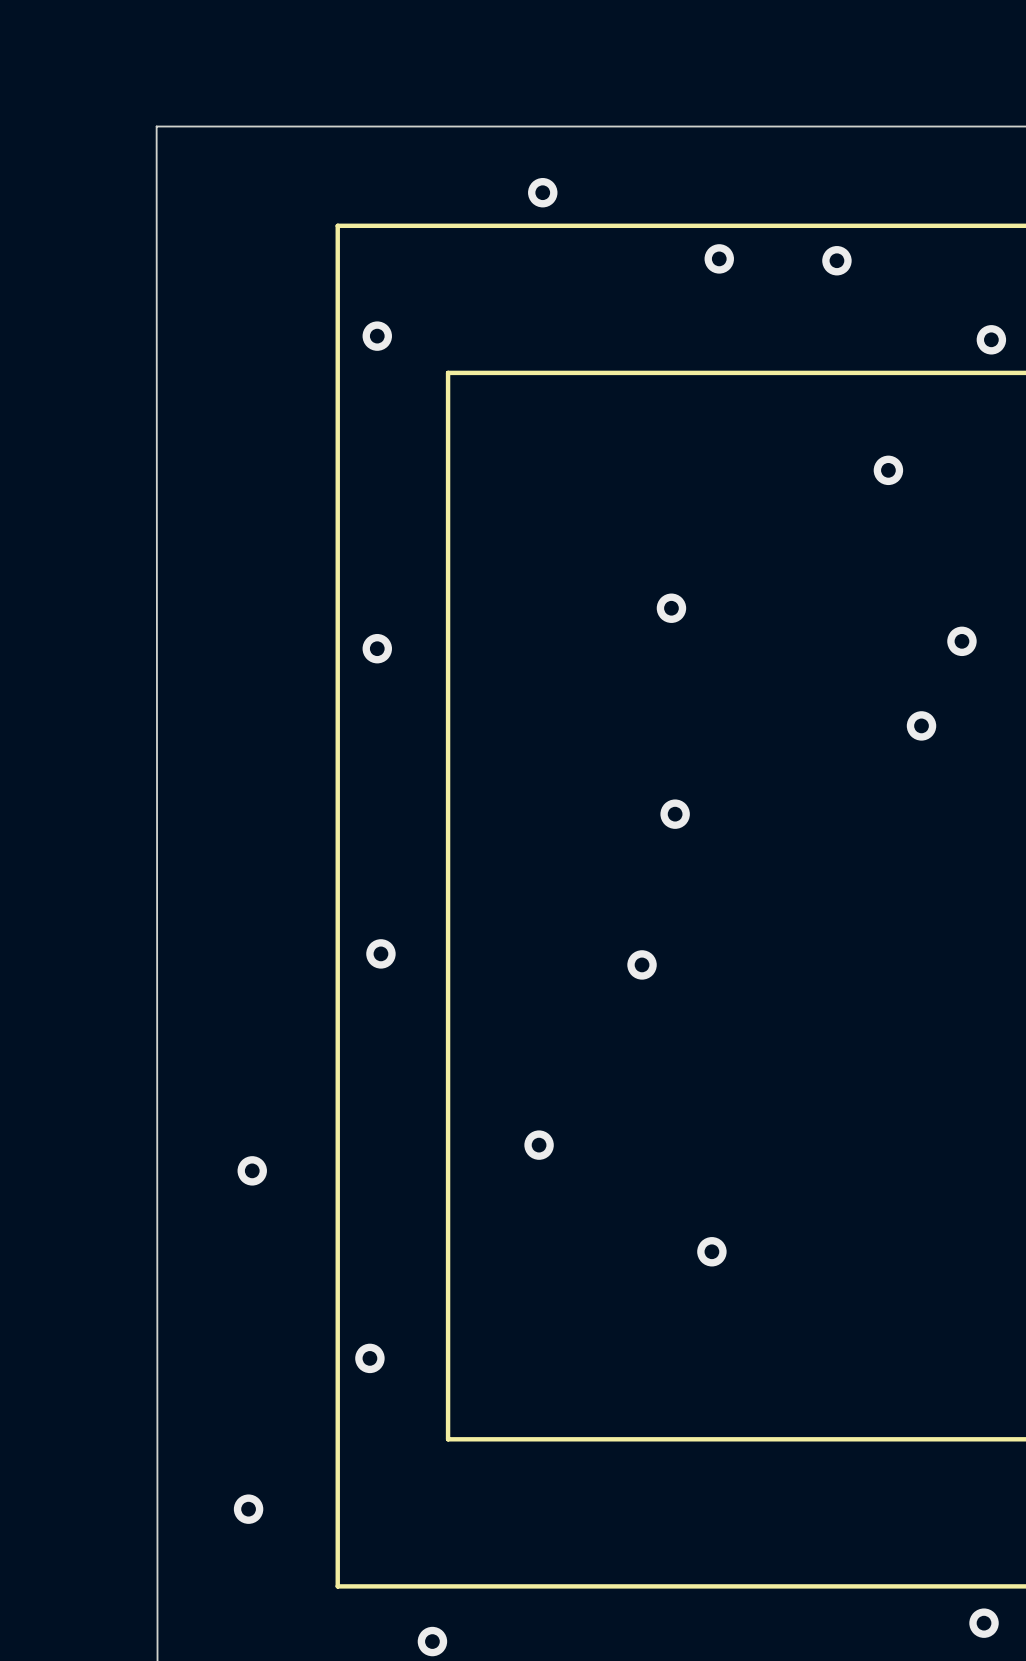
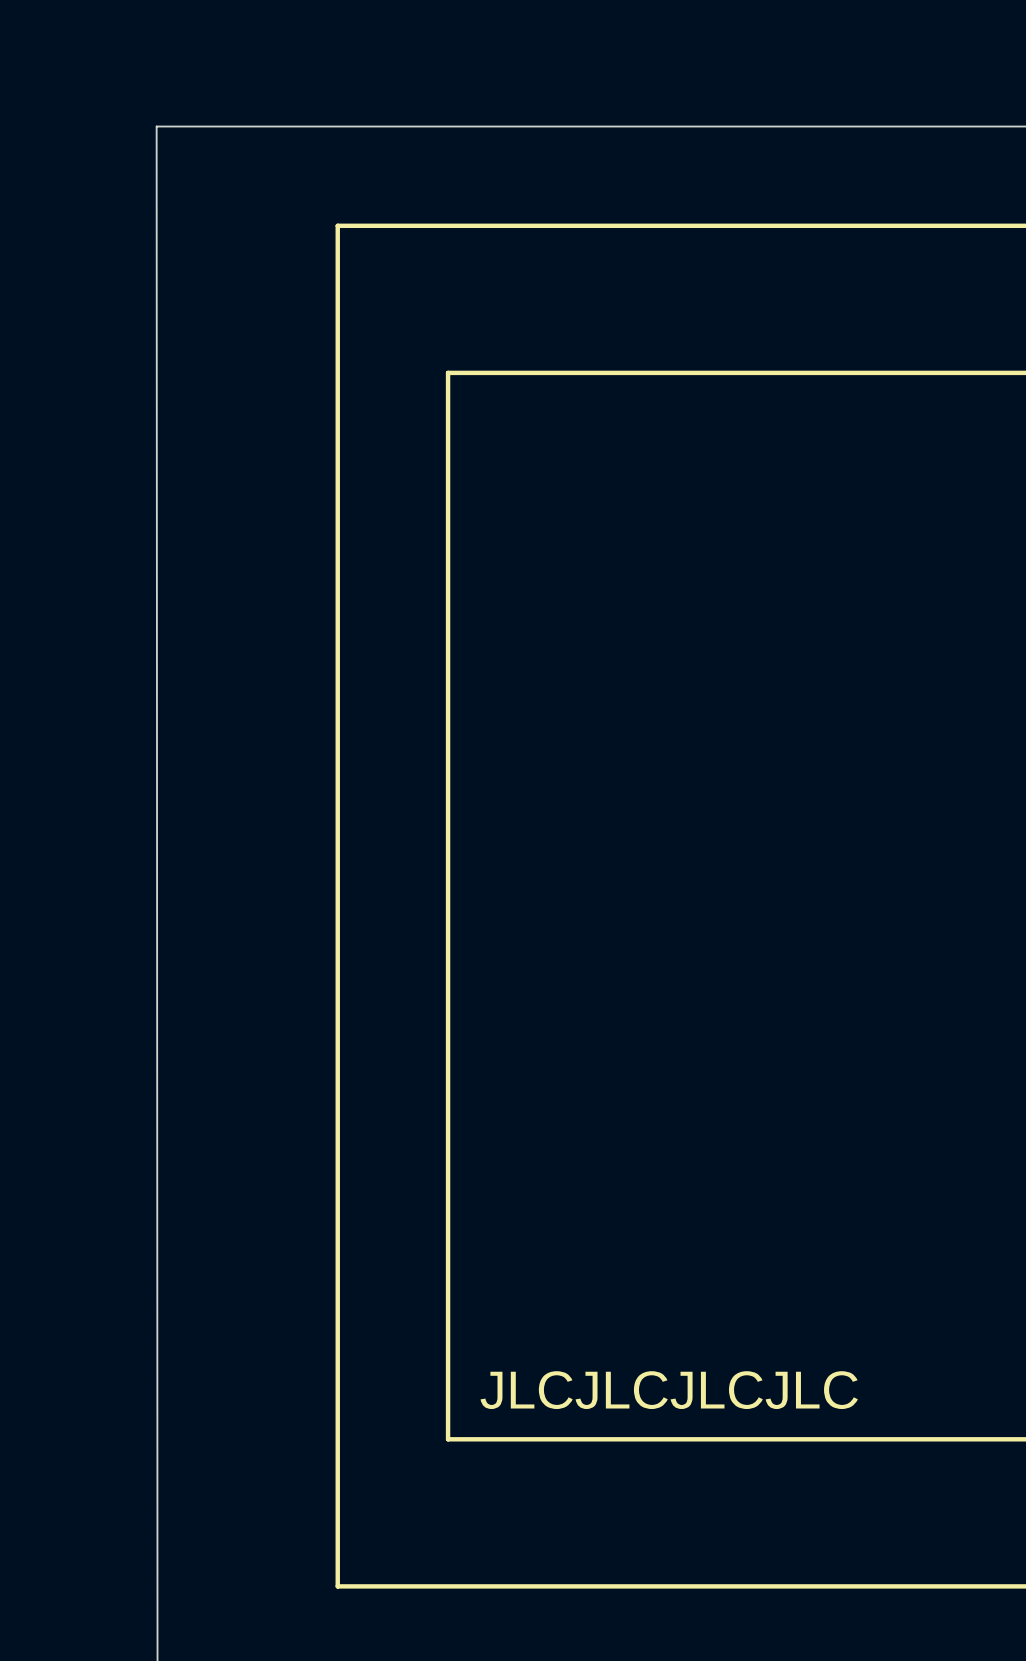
via: (542, 192) -> none
via: (719, 258) -> none
via: (836, 260) -> none
via: (377, 336) -> none
via: (991, 339) -> none
via: (888, 470) -> none
via: (671, 608) -> none
via: (961, 641) -> none
via: (377, 648) -> none
via: (921, 725) -> none
via: (675, 814) -> none
via: (380, 953) -> none
via: (642, 964) -> none
via: (539, 1145) -> none
via: (252, 1170) -> none
via: (711, 1251) -> none
via: (369, 1358) -> none
text: none -> JLCJLCJLCJLC (669, 1390)
via: (248, 1509) -> none
via: (984, 1623) -> none
via: (432, 1641) -> none

